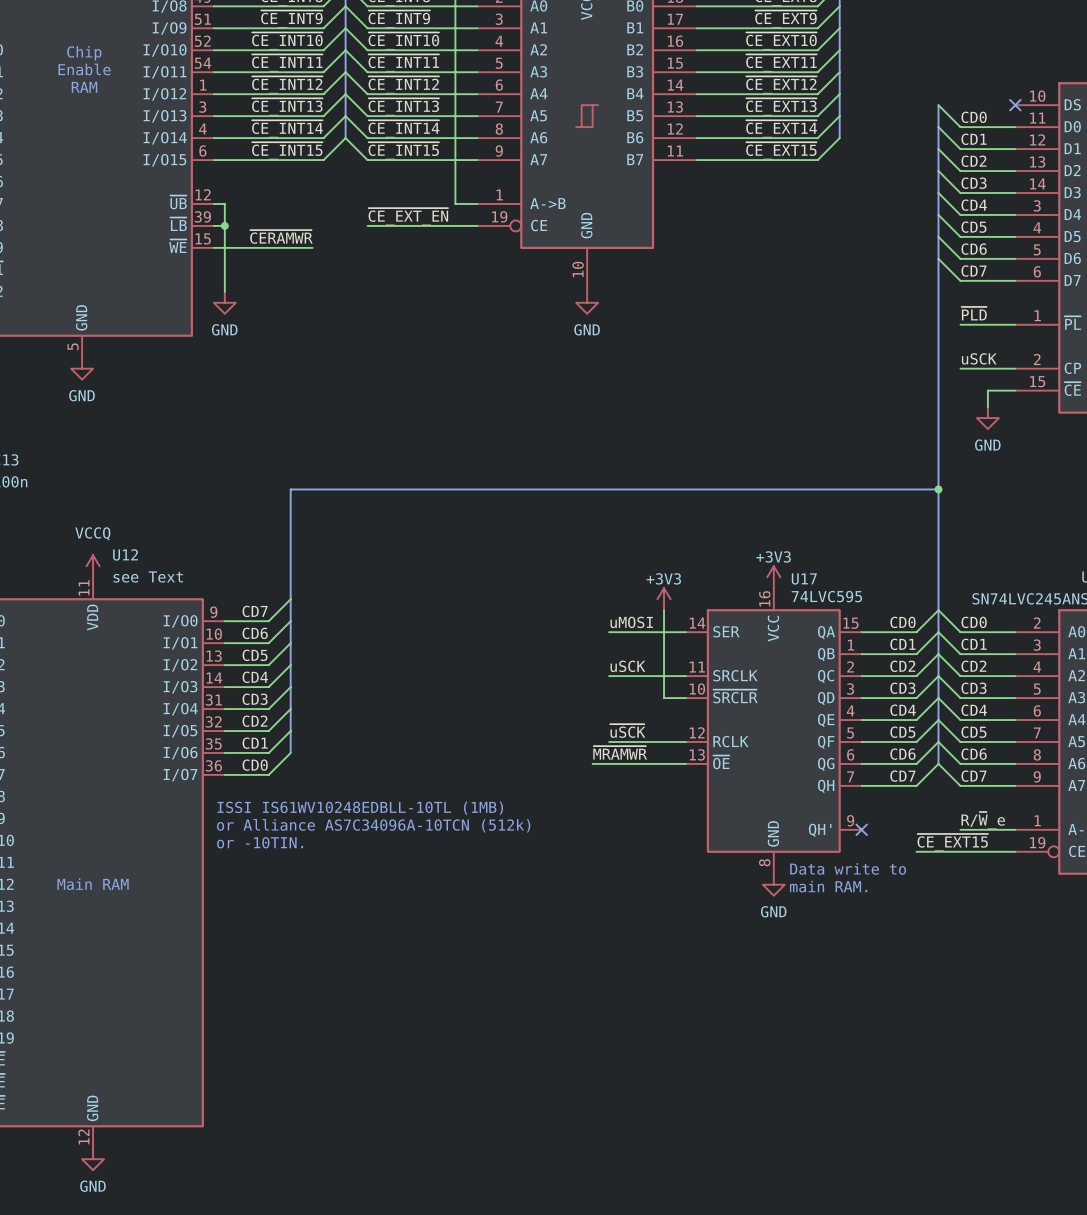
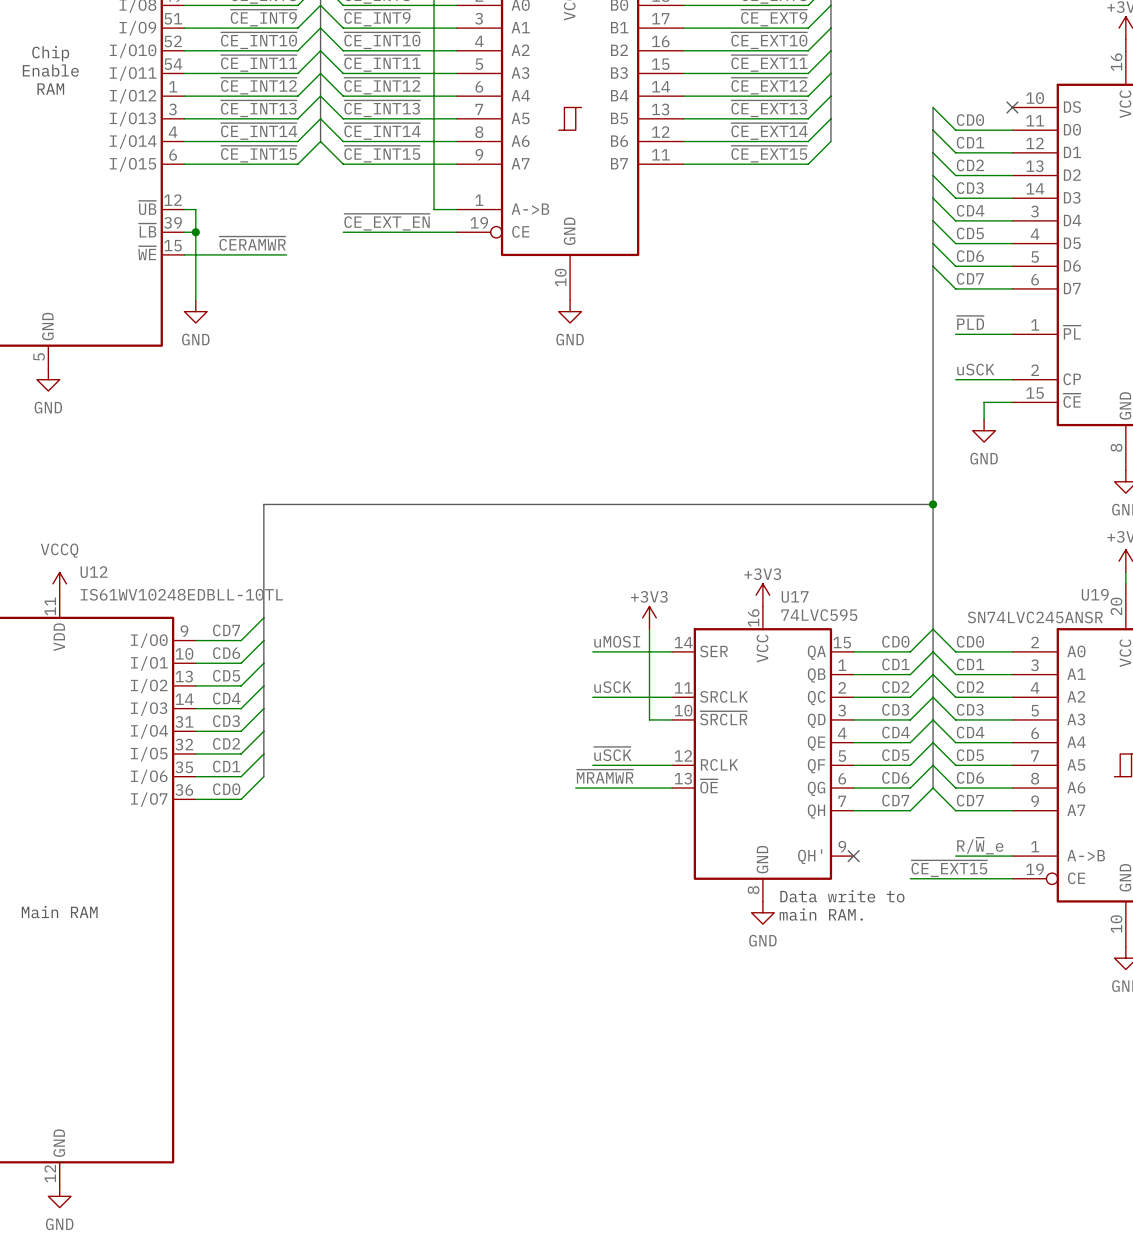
U12 value: see Text (148, 576) -> IS61WV10248EDBLL-10TL (181, 594)
text: ISSI IS61WV10248EDBLL-10TL (1MB) (360, 808) -> none
text: or Alliance AS7C34096A-10TCN (512k) (373, 825) -> none
text: or -10TIN. (260, 842) -> none

